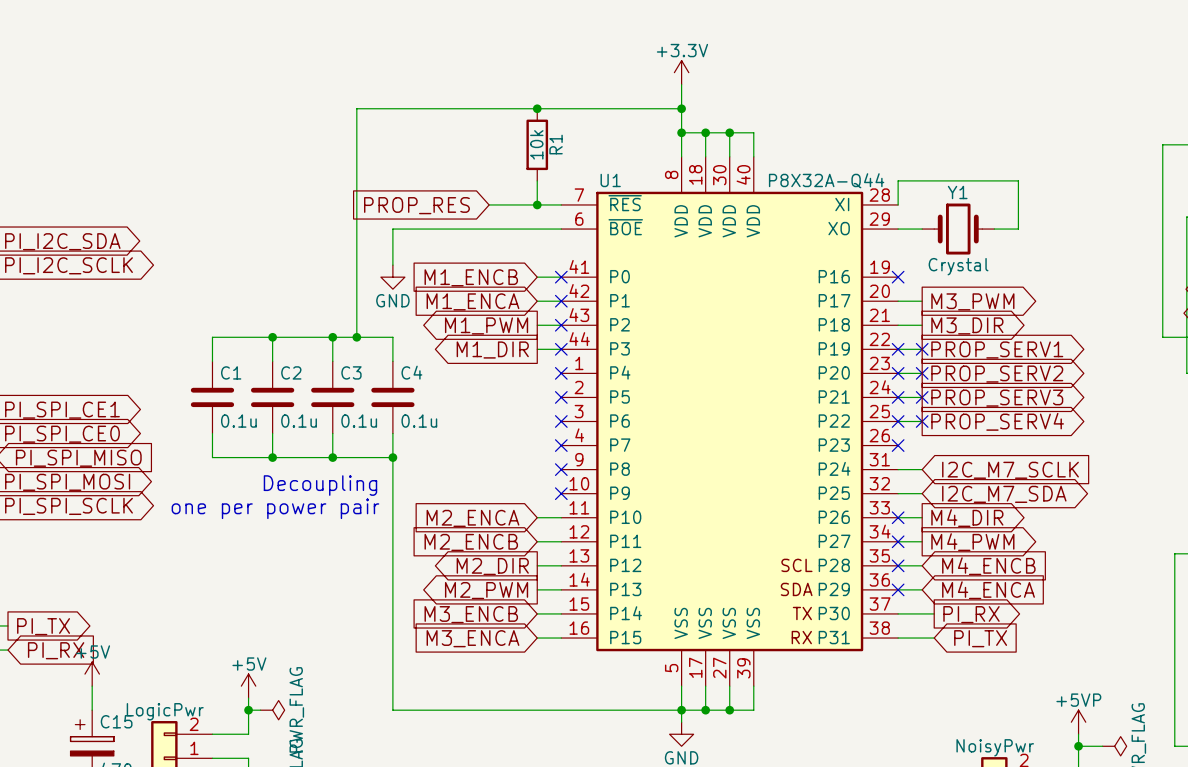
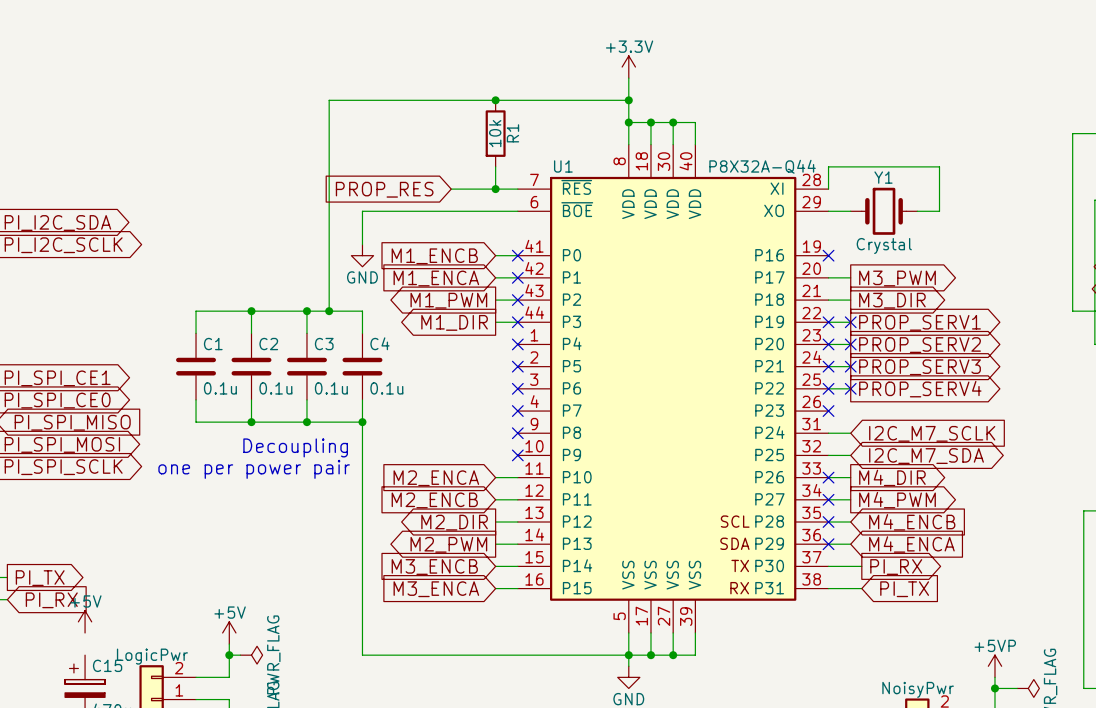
wire: (92, 686) (92, 710) -> none

